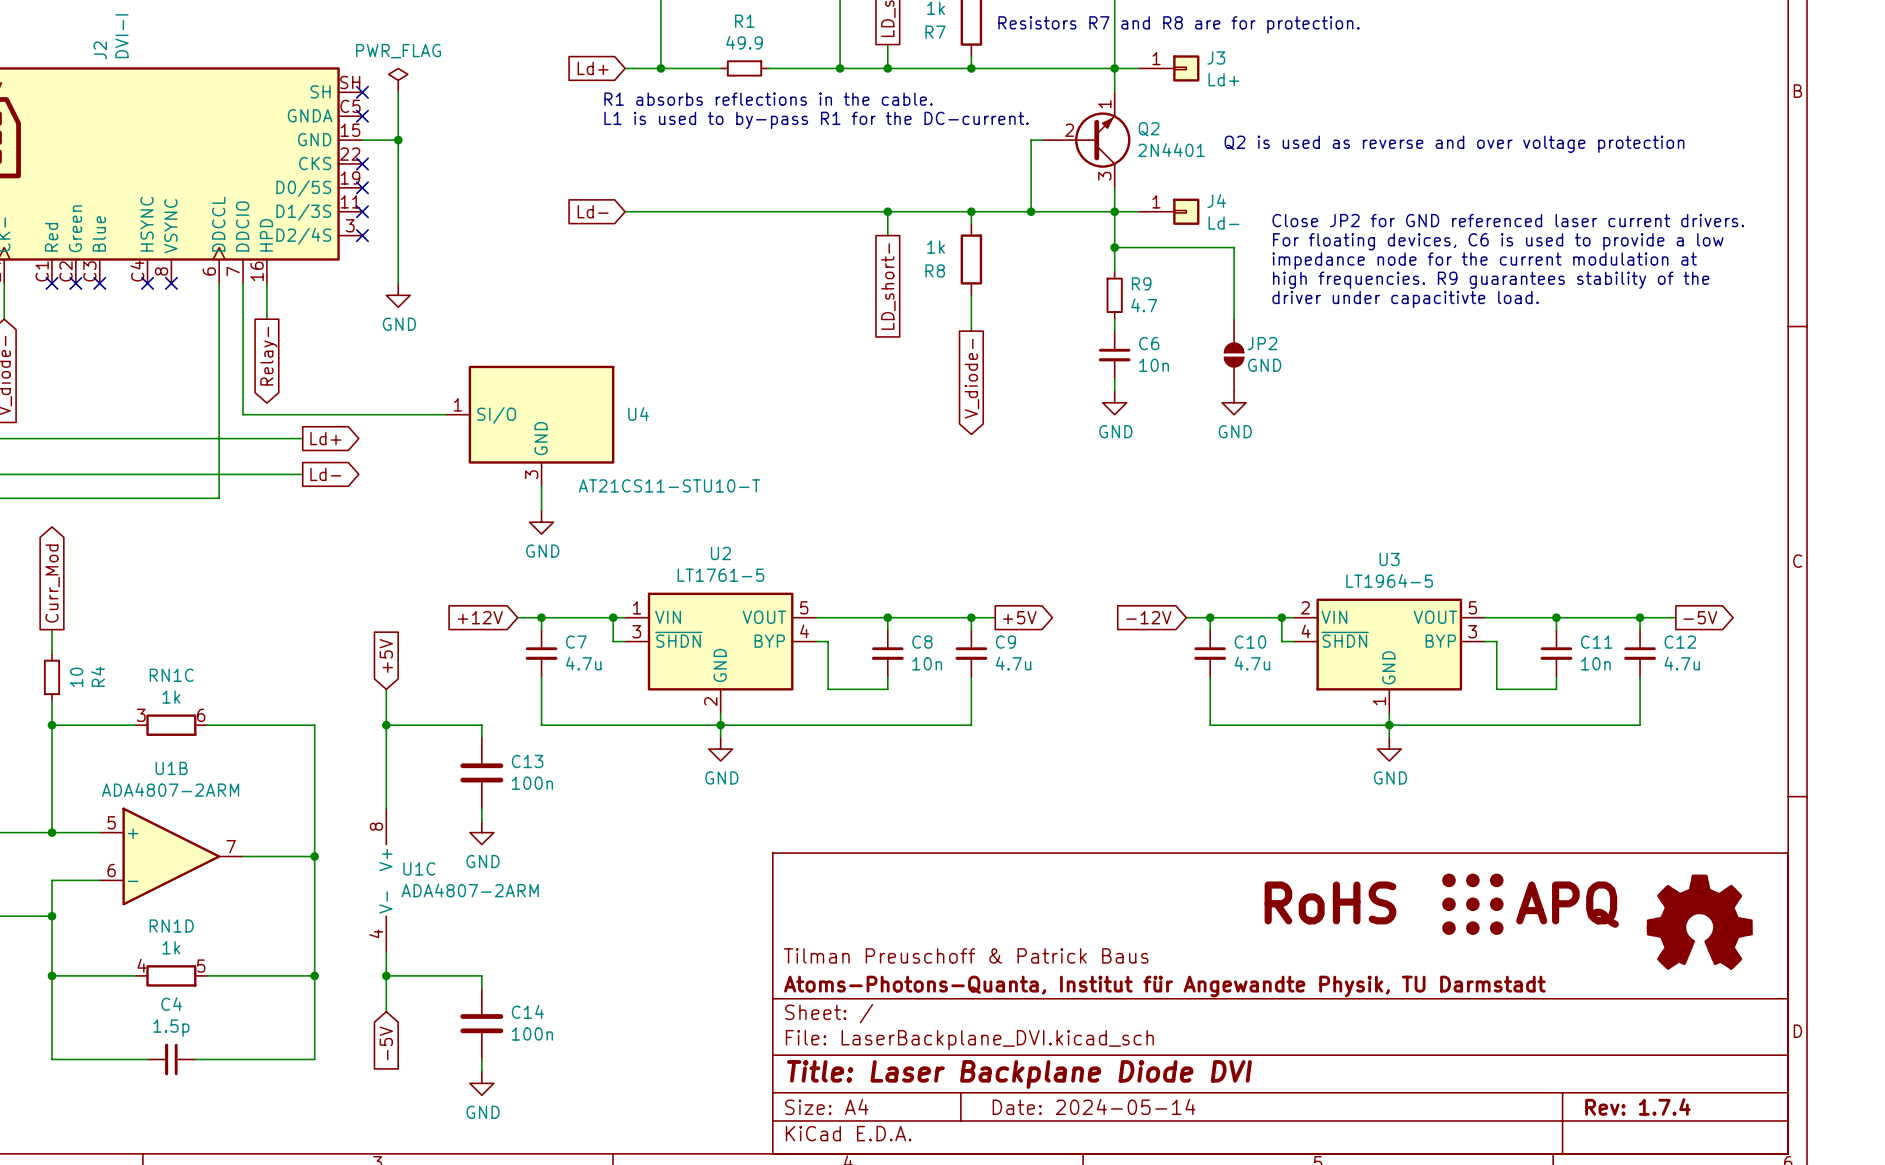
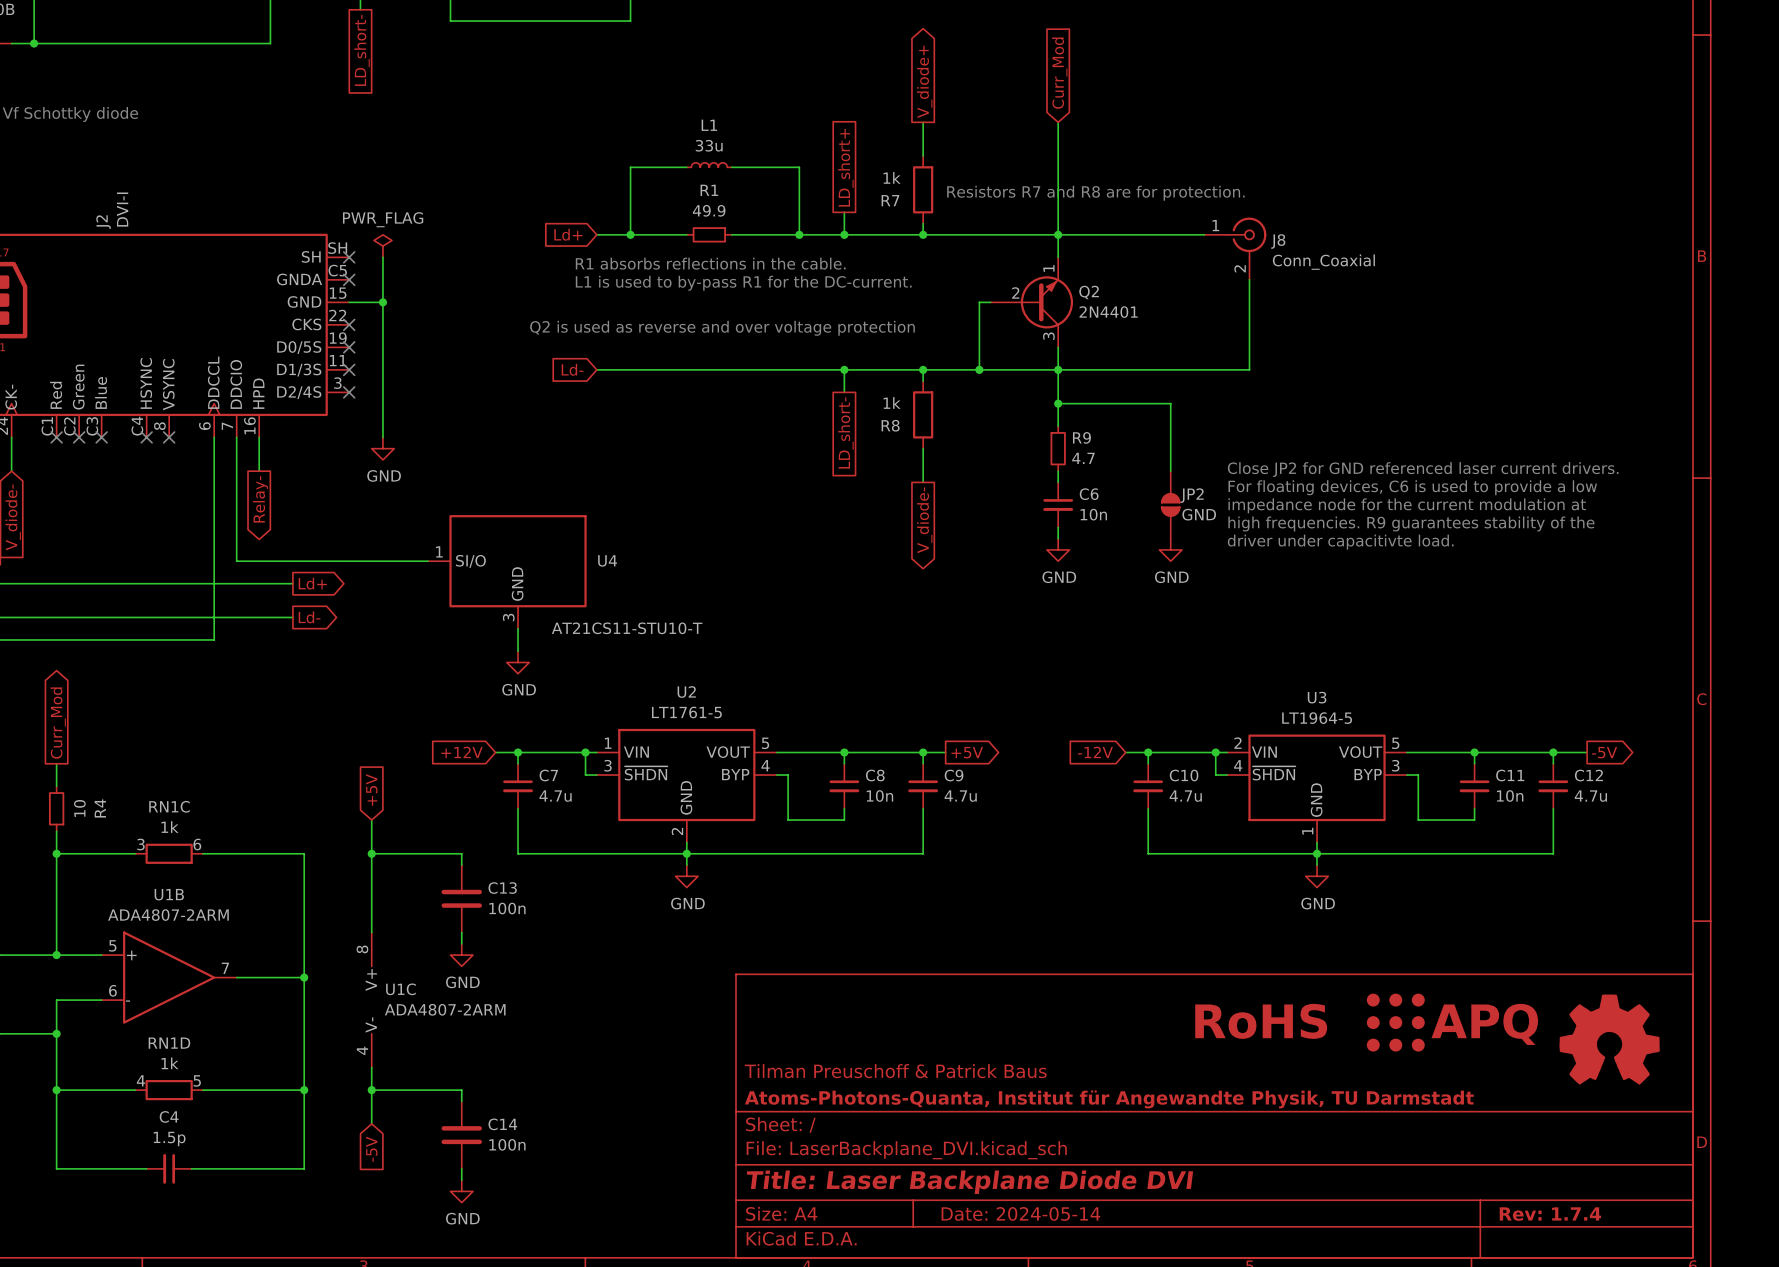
wire: none -> (1080, 234) (1204, 234)
J3: Ld+ (1169, 68) -> none
J8: none -> Conn_Coaxial (1235, 248)
wire: none -> (1249, 279) (1249, 369) (1080, 369)
text: Q2 is used as reverse and over voltage protection (1454, 144) -> none
text: none -> Q2 is used as reverse and over voltage protection (722, 328)
J4: Ld- (1169, 211) -> none
text position: Close JP2 for GND referenced laser current drivers. (1508, 220) -> Close JP2 for GND referenced laser current drivers. (1423, 469)
text position: For floating devices, C6 is used to provide a low (1498, 241) -> For floating devices, C6 is used to provide a low (1412, 487)
text position: impedance node for the current modulation at (1484, 261) -> impedance node for the current modulation at (1407, 505)
text position: high frequencies. R9 guarantees stability of the (1491, 280) -> high frequencies. R9 guarantees stability of the (1411, 523)
text position: driver under capacitivte load. (1405, 299) -> driver under capacitivte load. (1340, 542)

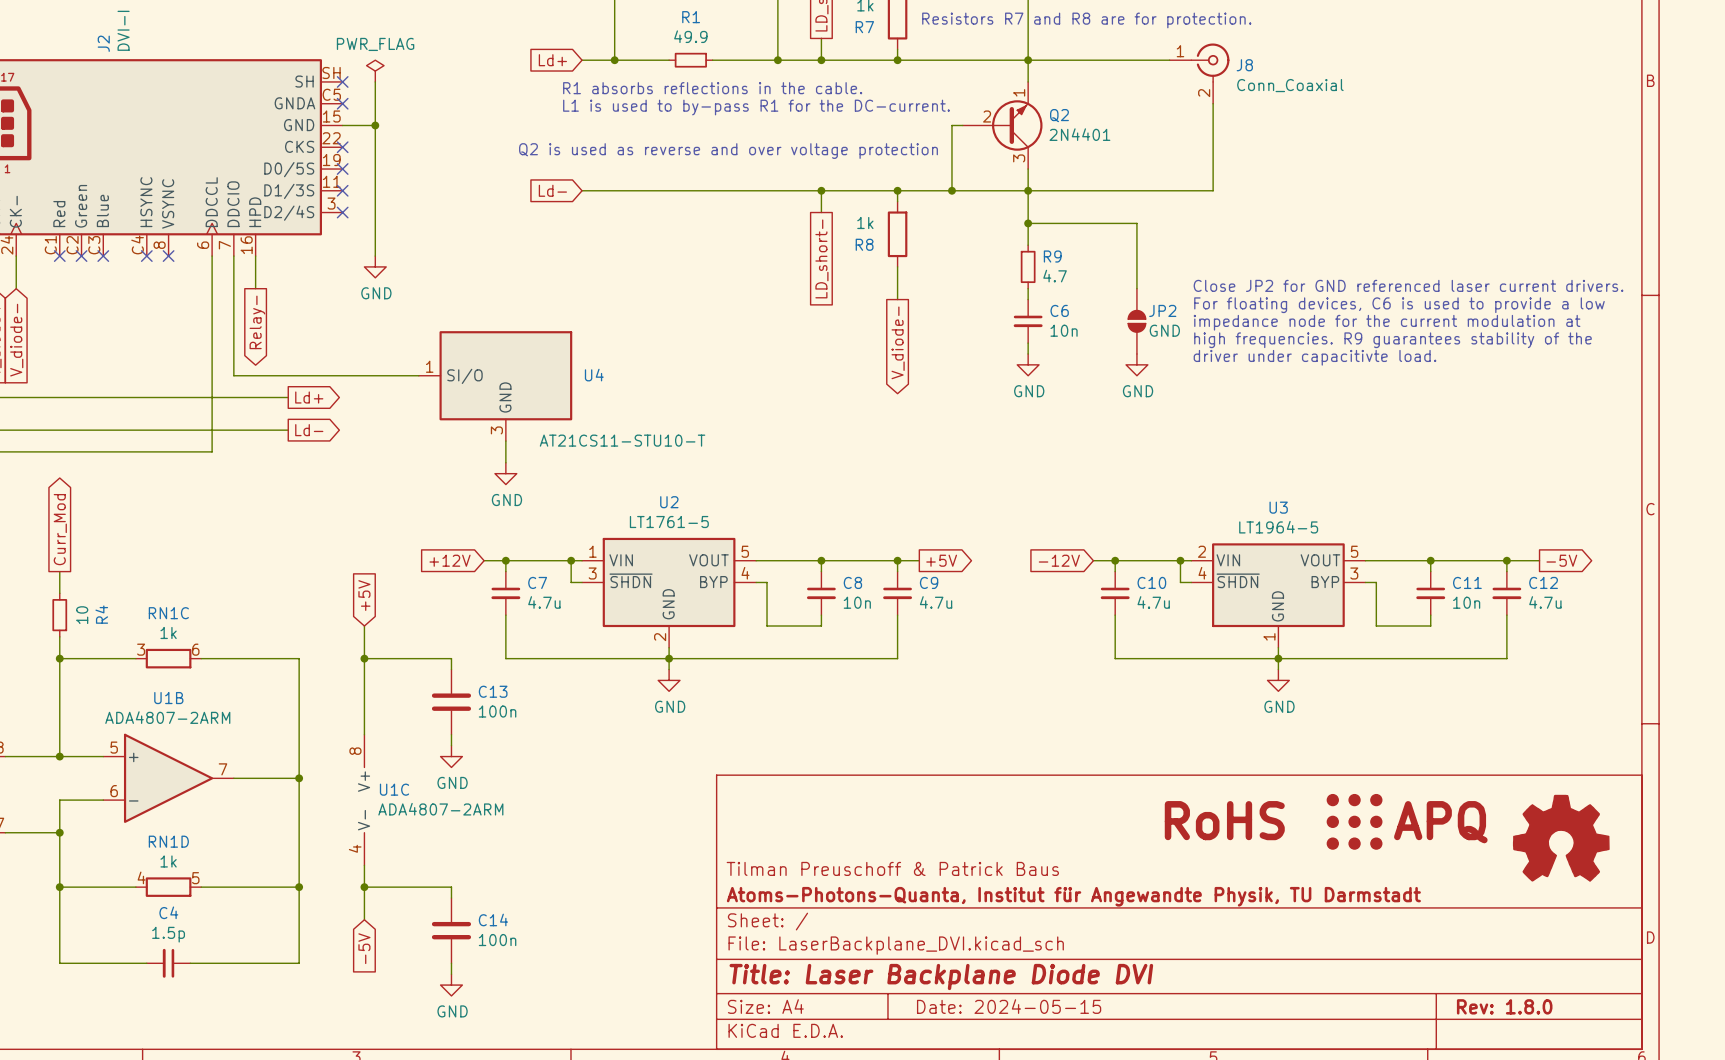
title block: Date: 2024-05-14 (1020, 1213) -> Date: 2024-05-15 (1009, 1006)
title block: Rev: 1.7.4 (1550, 1214) -> Rev: 1.8.0 (1504, 1006)

